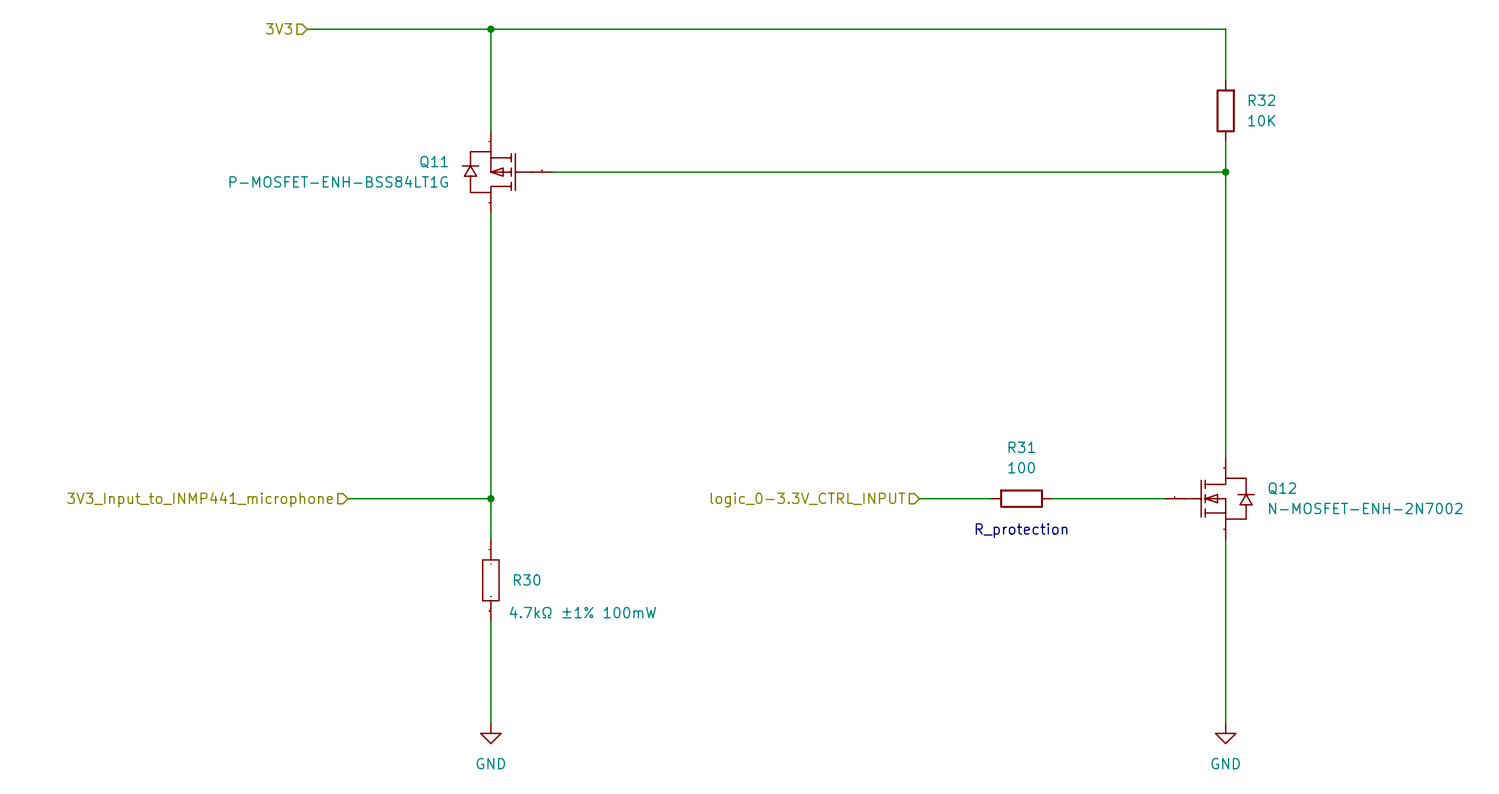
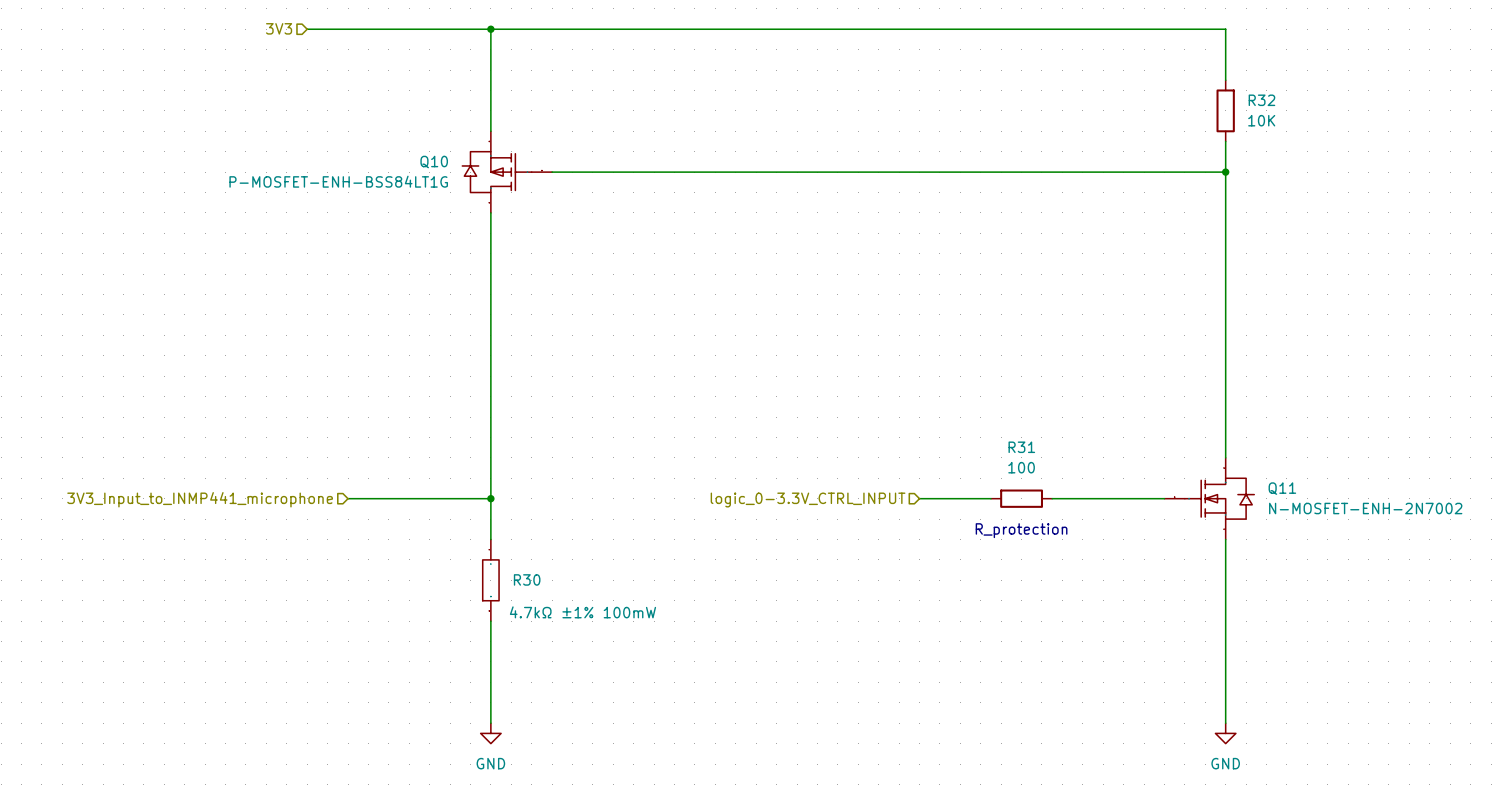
Q11 name: Q11 (434, 162) -> Q10 (434, 162)
Q12 name: Q12 (1282, 488) -> Q11 (1282, 488)

